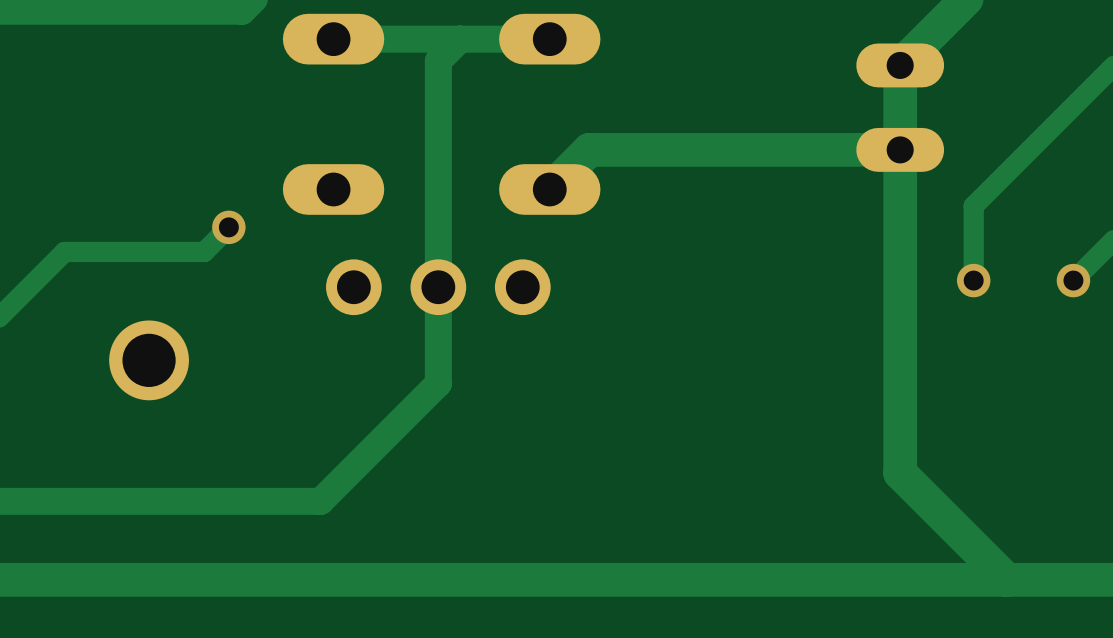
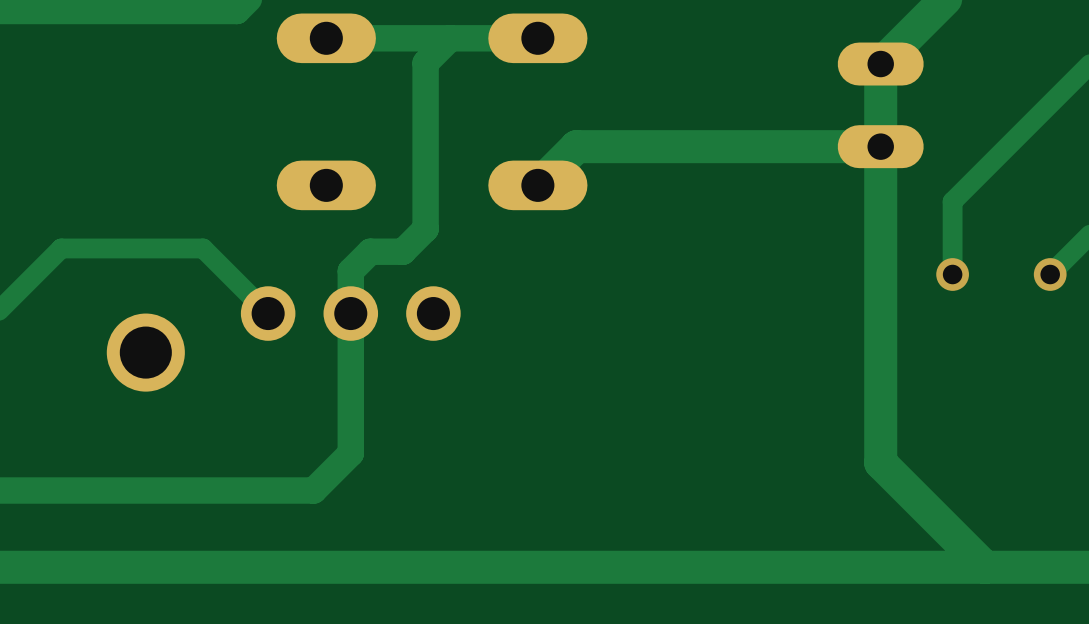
track: (438, 61) (438, 383) (358, 463) -> (428, 59) (425, 63) (425, 228) (402, 251) (370, 251) (350, 271) (350, 453)
track: (228, 227) (204, 251) (64, 251) (62, 253) -> (268, 313) (203, 248) (61, 248)
via: (228, 227) -> none
part position: (438, 287) -> (350, 313)

